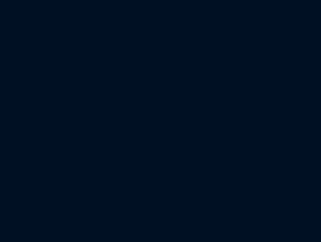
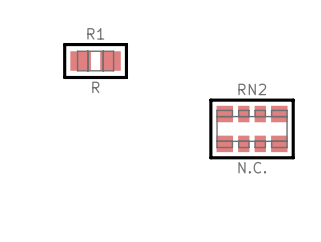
R1: none -> R (95, 61)
RN2: none -> N.C. (252, 128)

